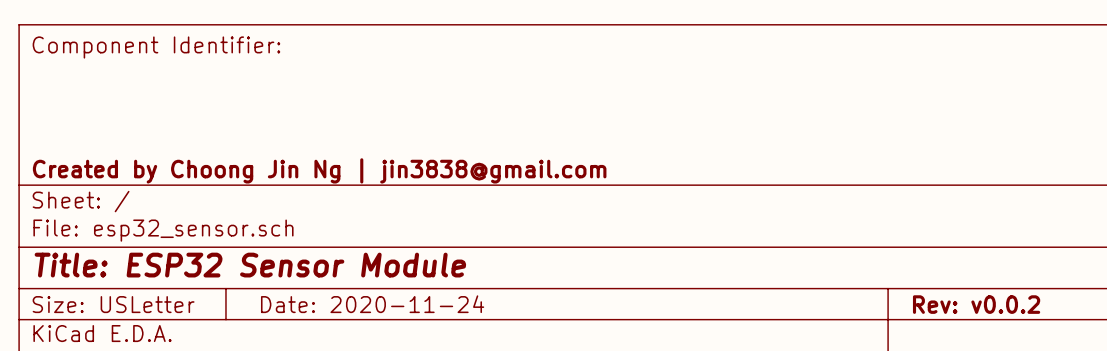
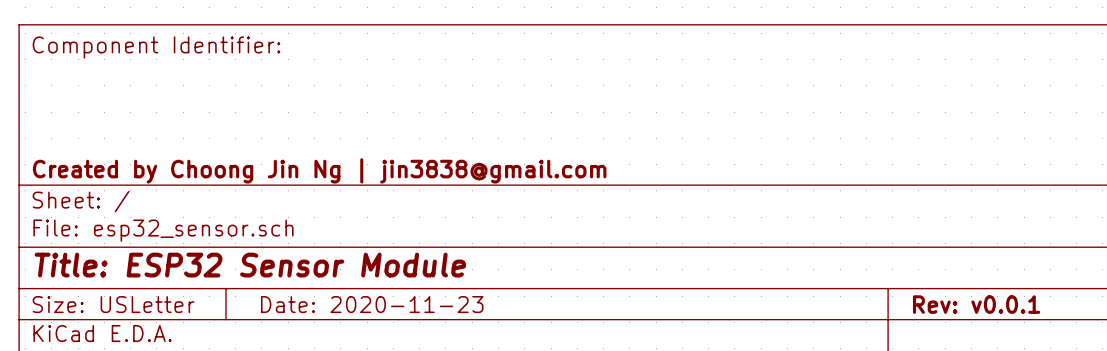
title block: Date: 2020-11-24 (372, 304) -> Date: 2020-11-23 (372, 304)
title block: Rev: v0.0.2 (976, 304) -> Rev: v0.0.1 (976, 304)

